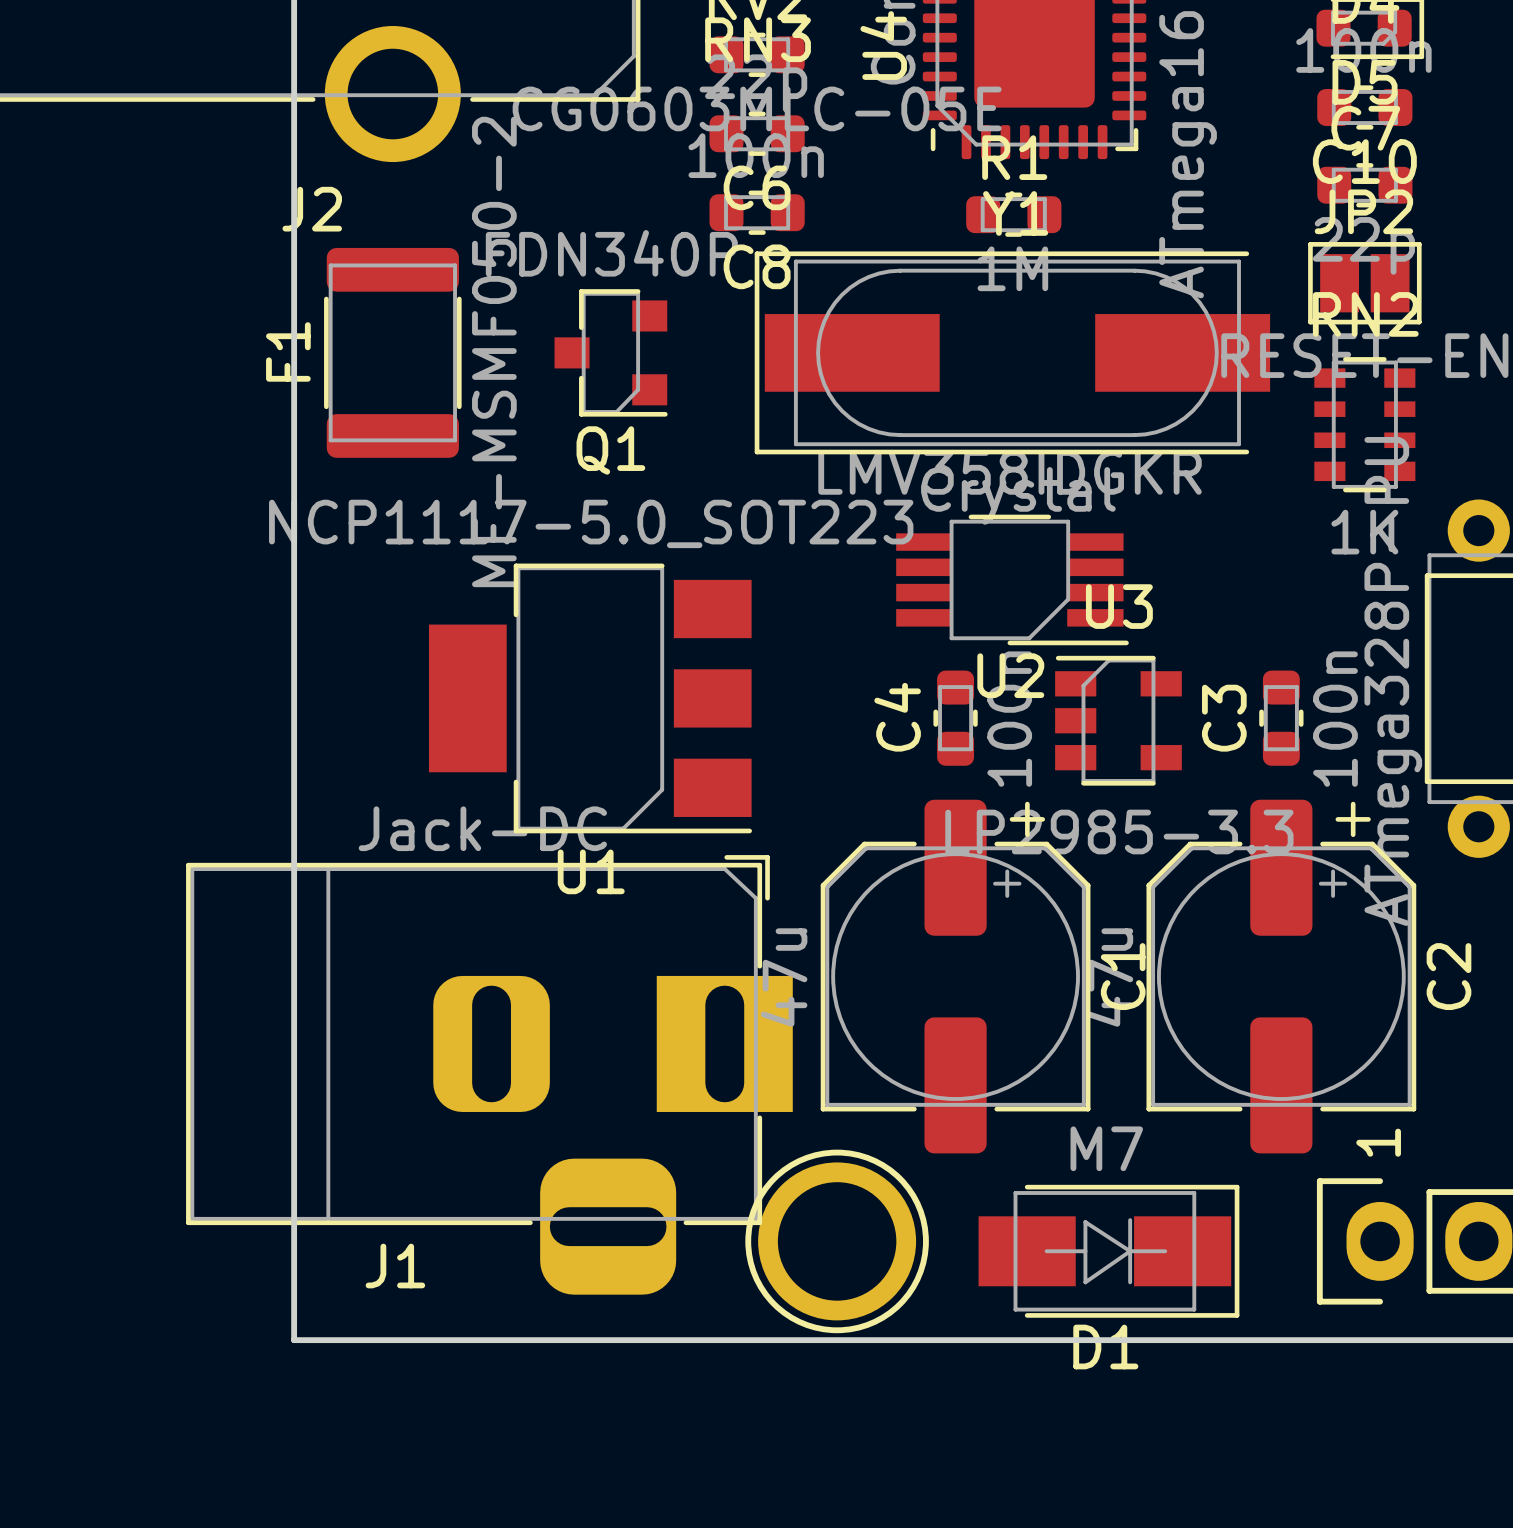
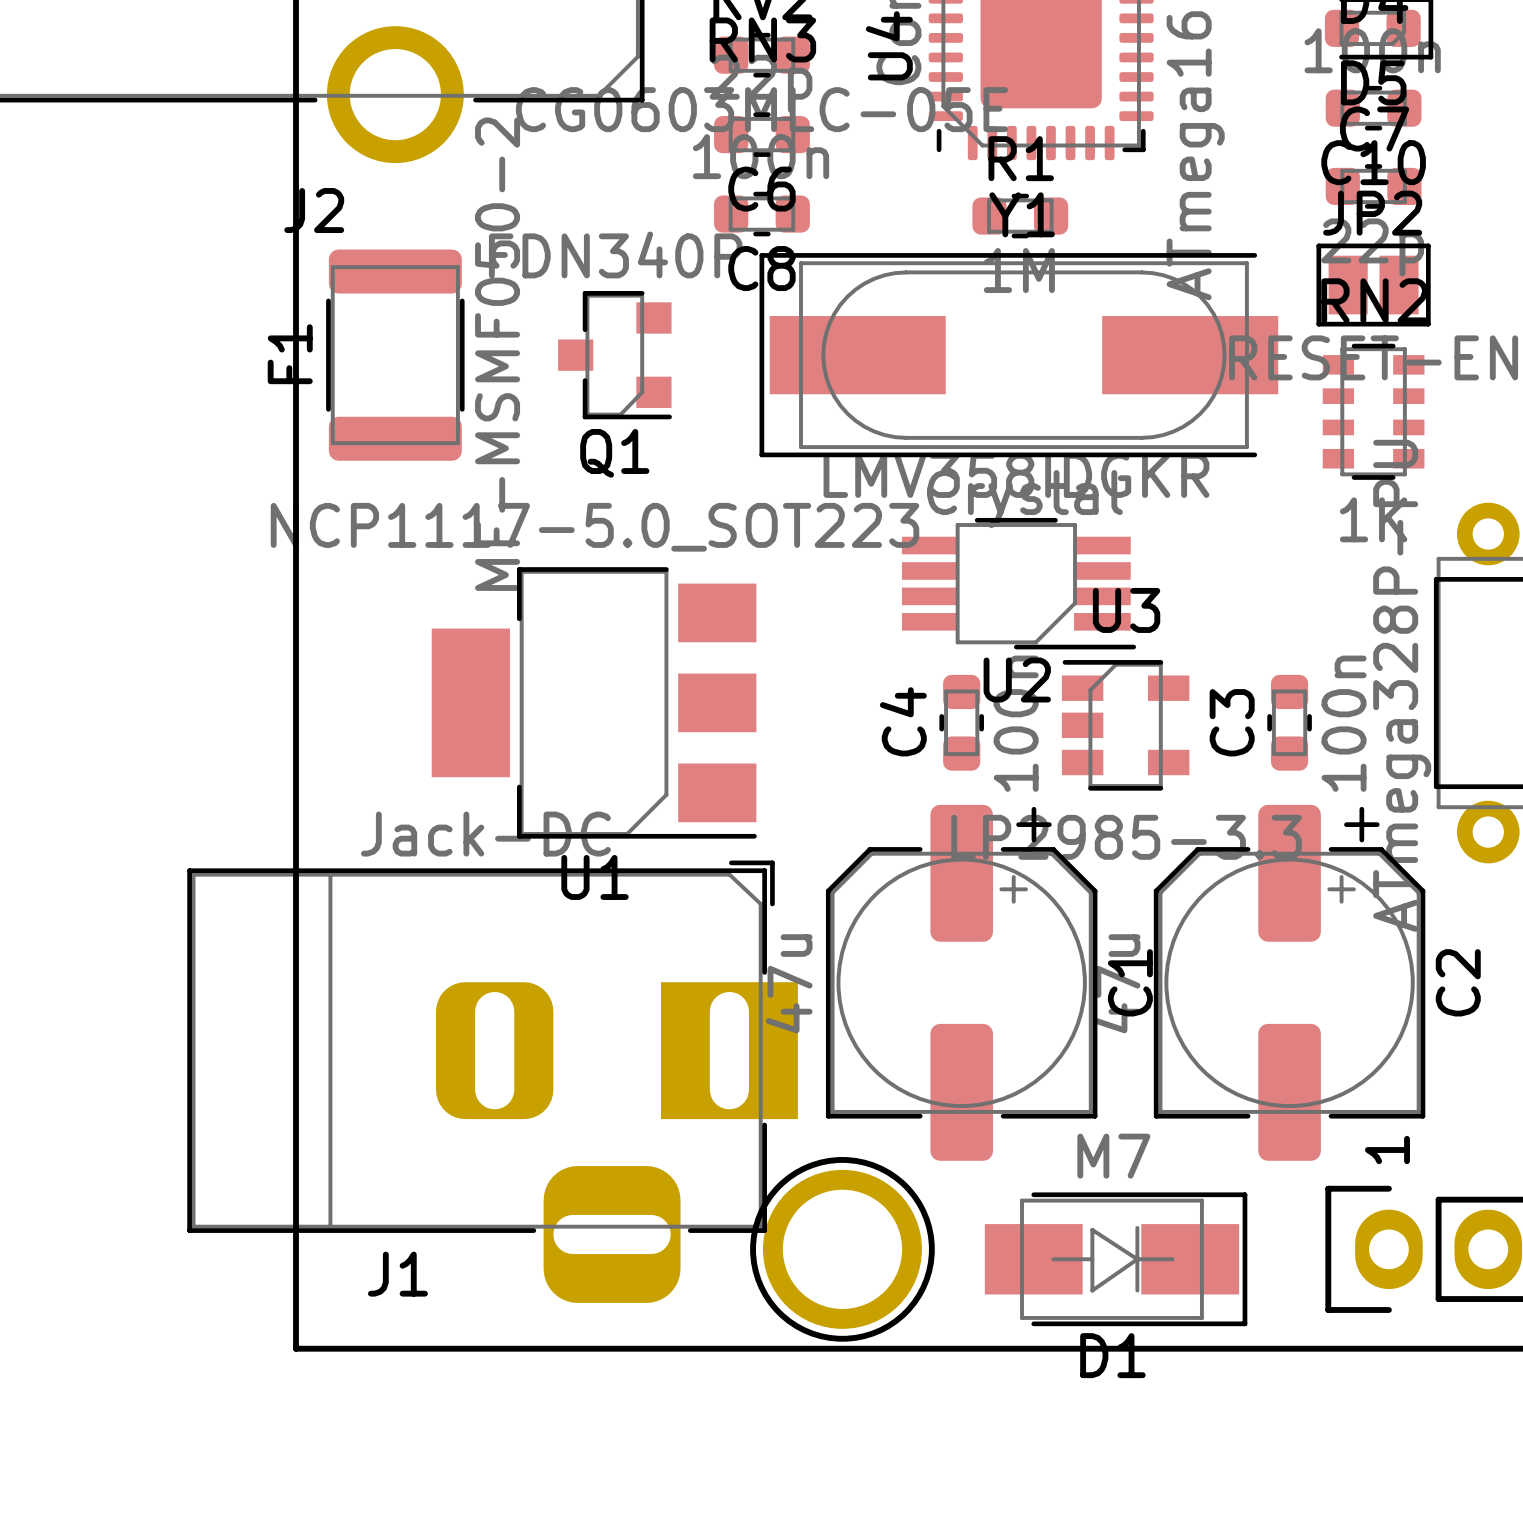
RN2 position: (1364, 424) -> (1373, 411)

